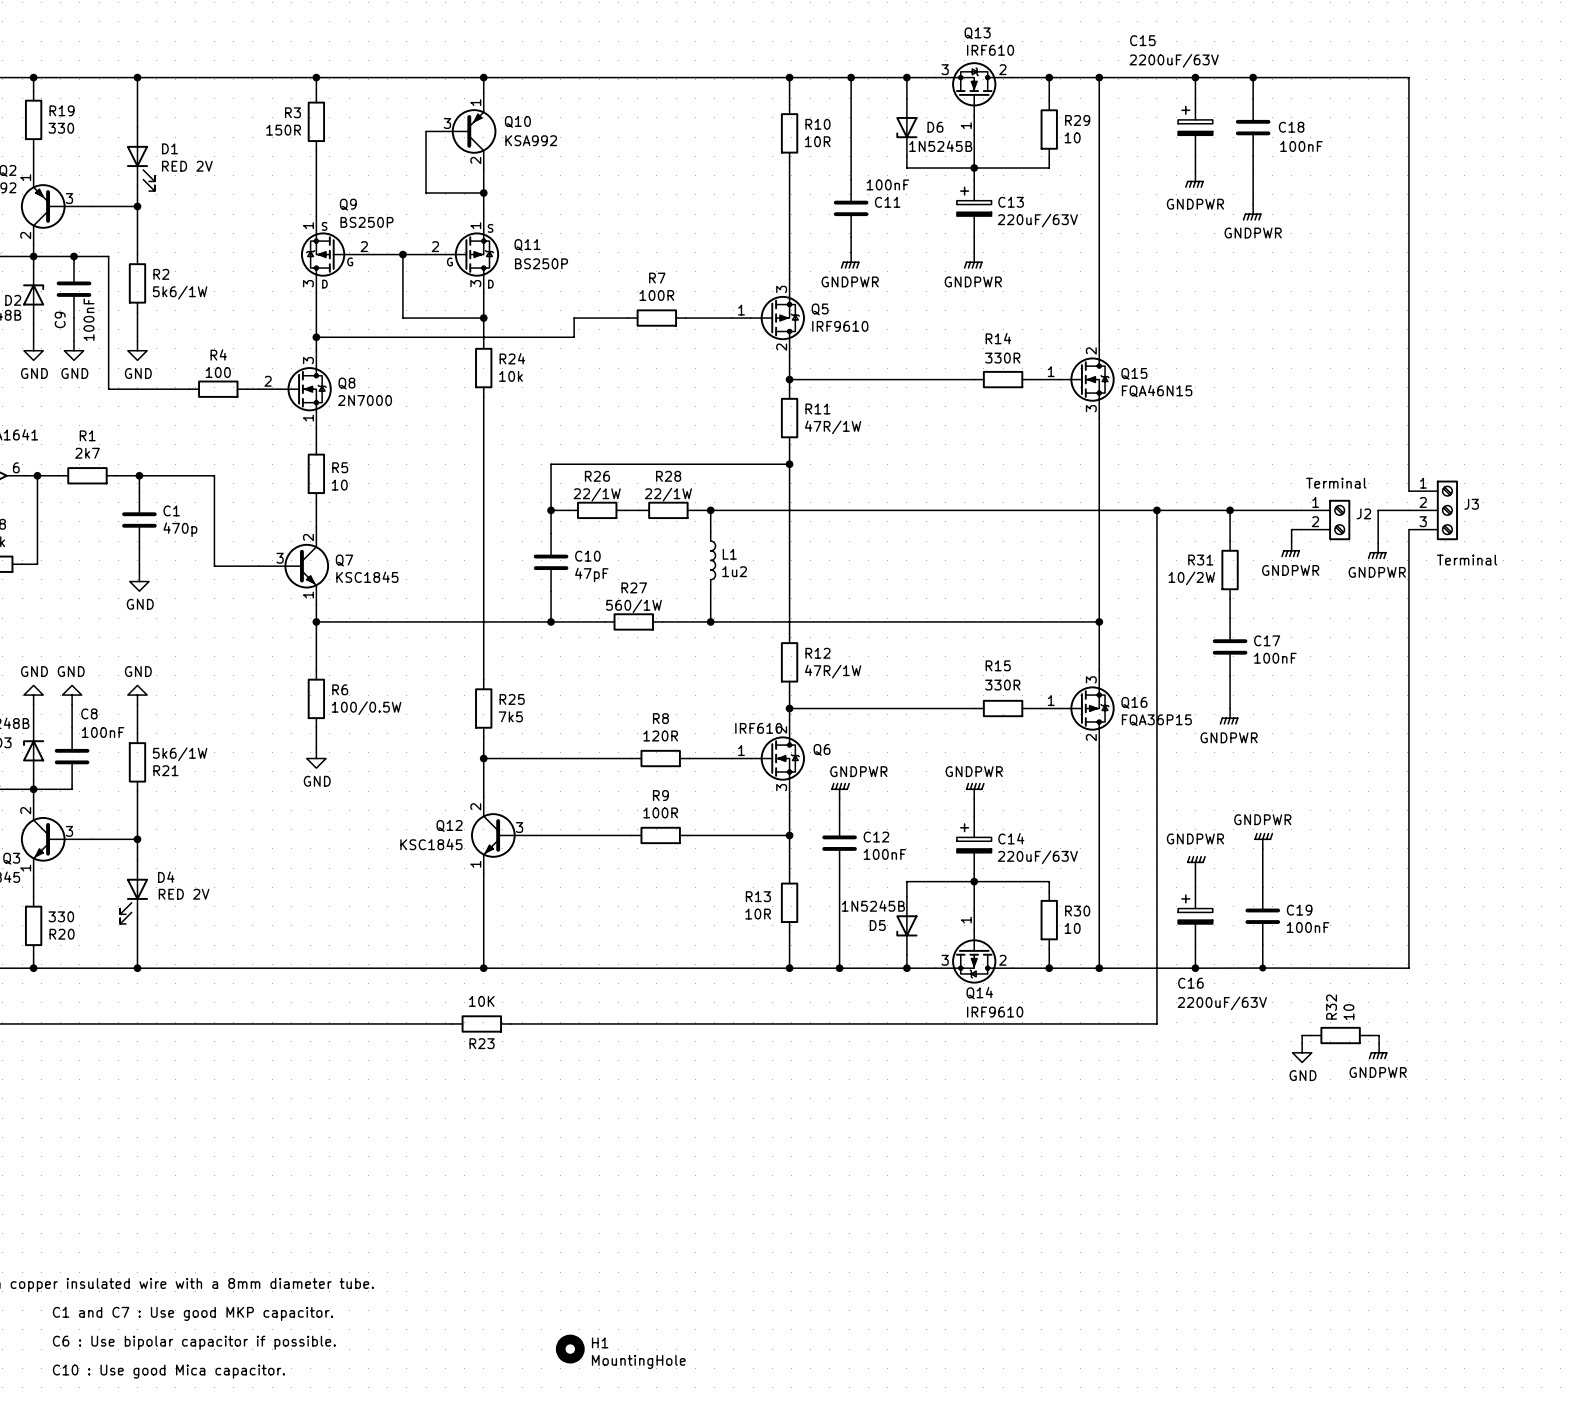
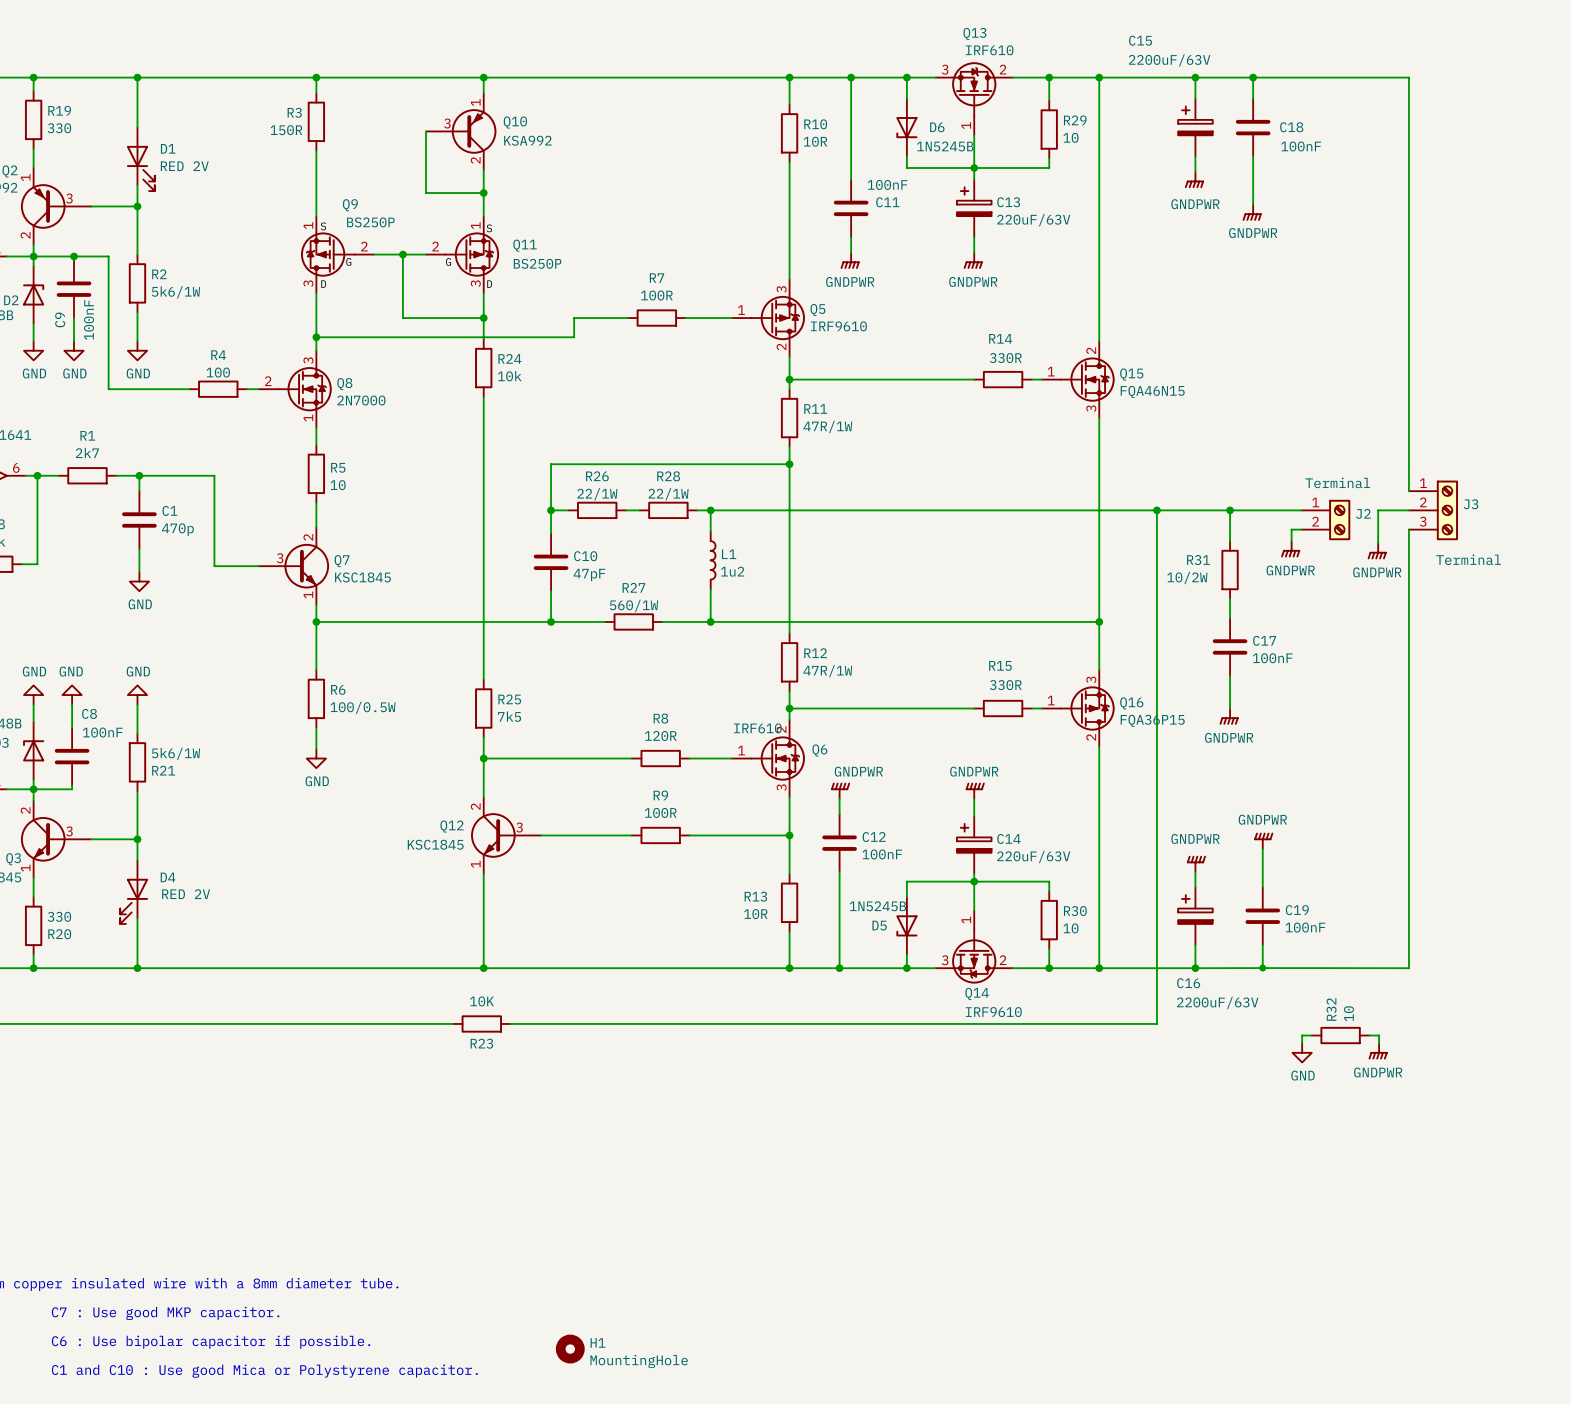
text: C1 and C7 : Use good MKP capacitor. (192, 1313) -> C7 : Use good MKP capacitor. (165, 1313)
text: C10 : Use good Mica capacitor. (168, 1371) -> C1 and C10 : Use good Mica or Polystyrene capacitor. (264, 1371)

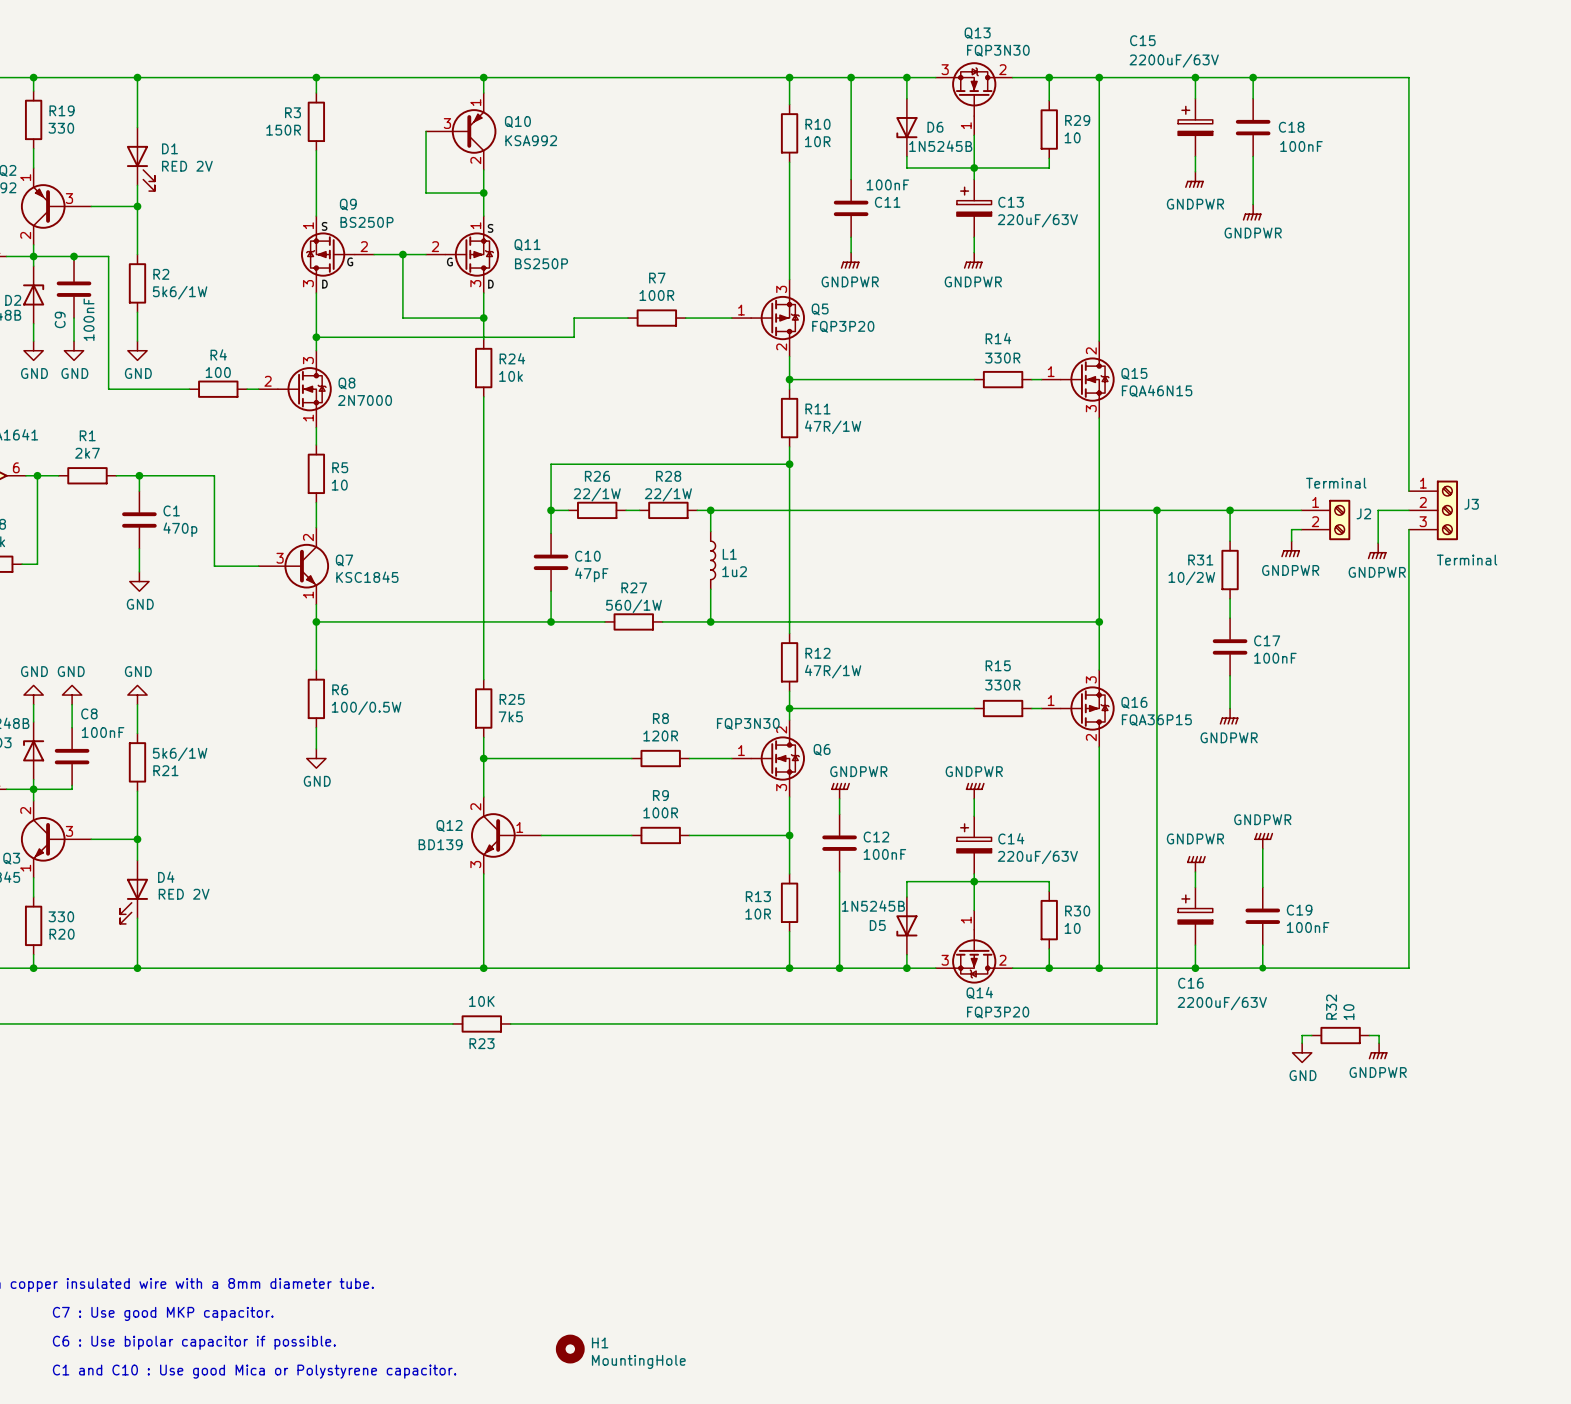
Q13 value: IRF610 (989, 50) -> FQP3N30 (998, 50)
Q5 value: IRF9610 (838, 326) -> FQP3P20 (843, 326)
Q6 value: IRF610 (757, 728) -> FQP3N30 (748, 724)
Q12 pin number: 3 (519, 827) -> 1 (519, 827)
Q12 value: KSC1845 (435, 844) -> BD139 (440, 844)
Q12 pin number: 1 (475, 864) -> 3 (475, 864)
Q14 value: IRF9610 (993, 1012) -> FQP3P20 (998, 1012)

